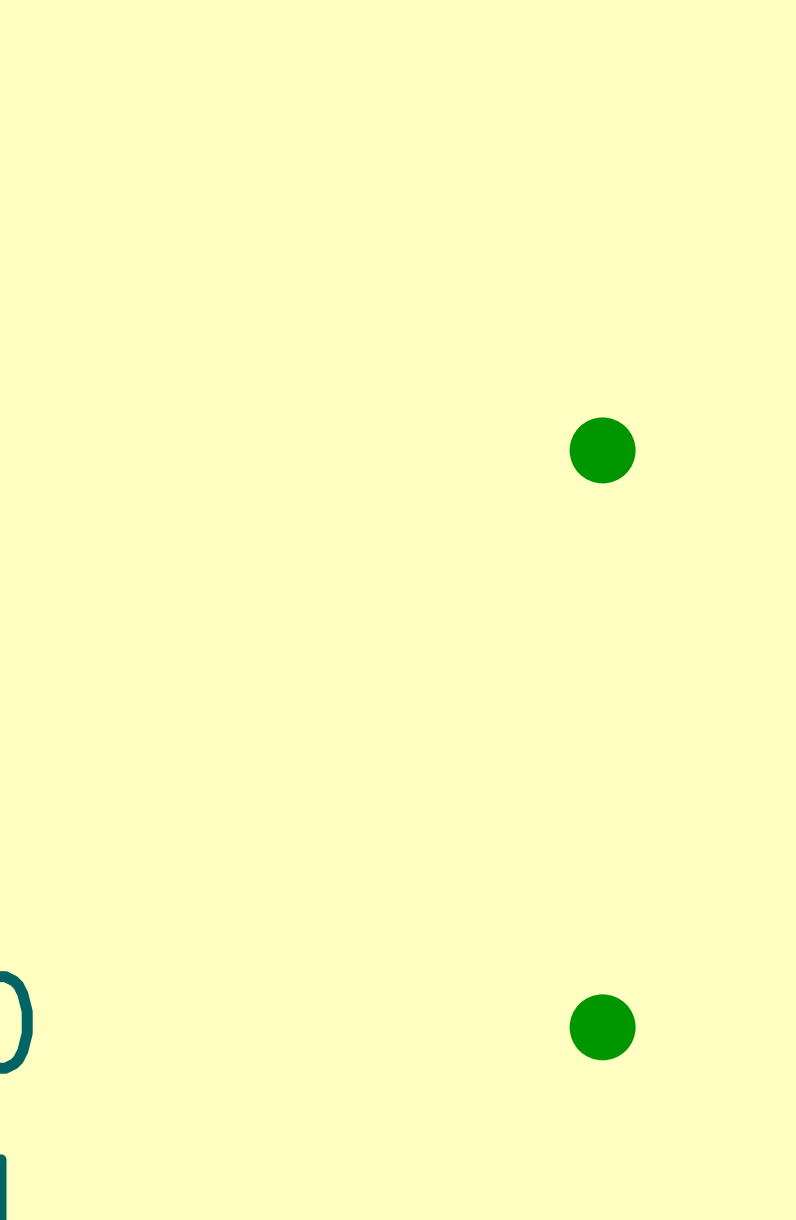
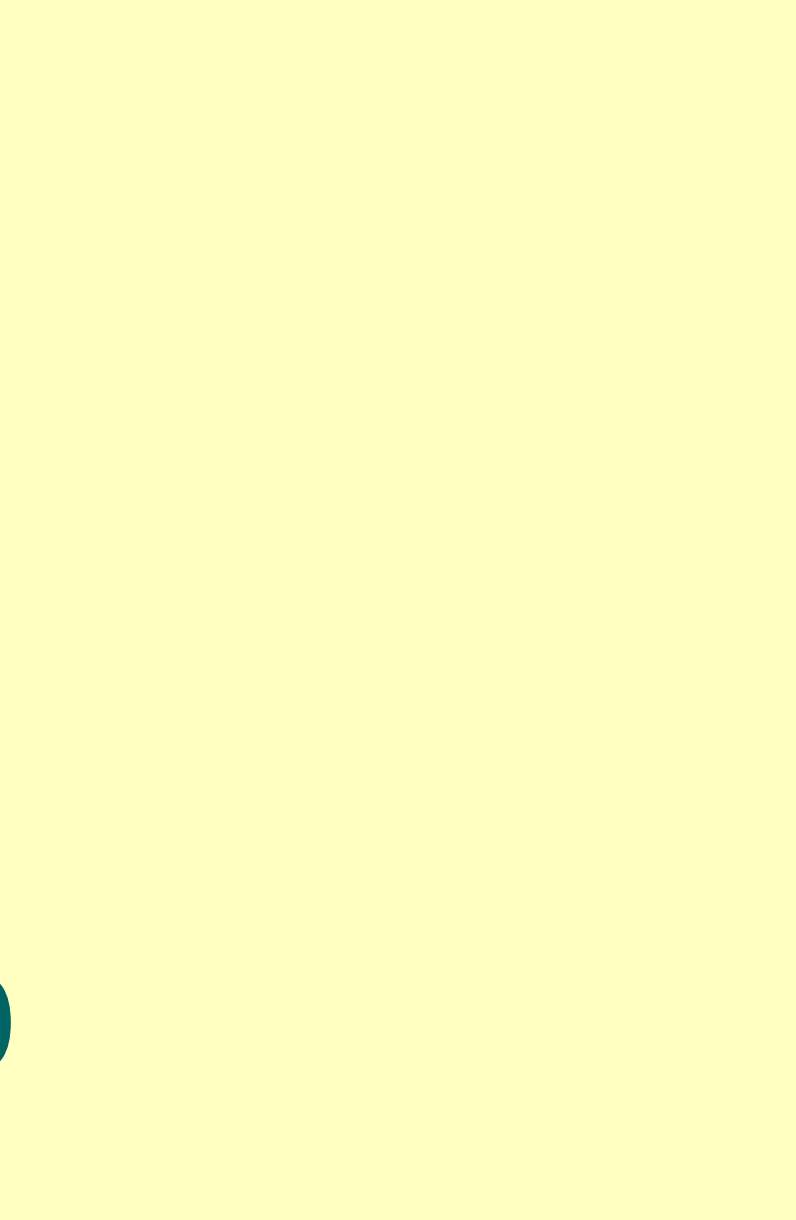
junction: (602, 450) -> none
junction: (602, 1027) -> none

